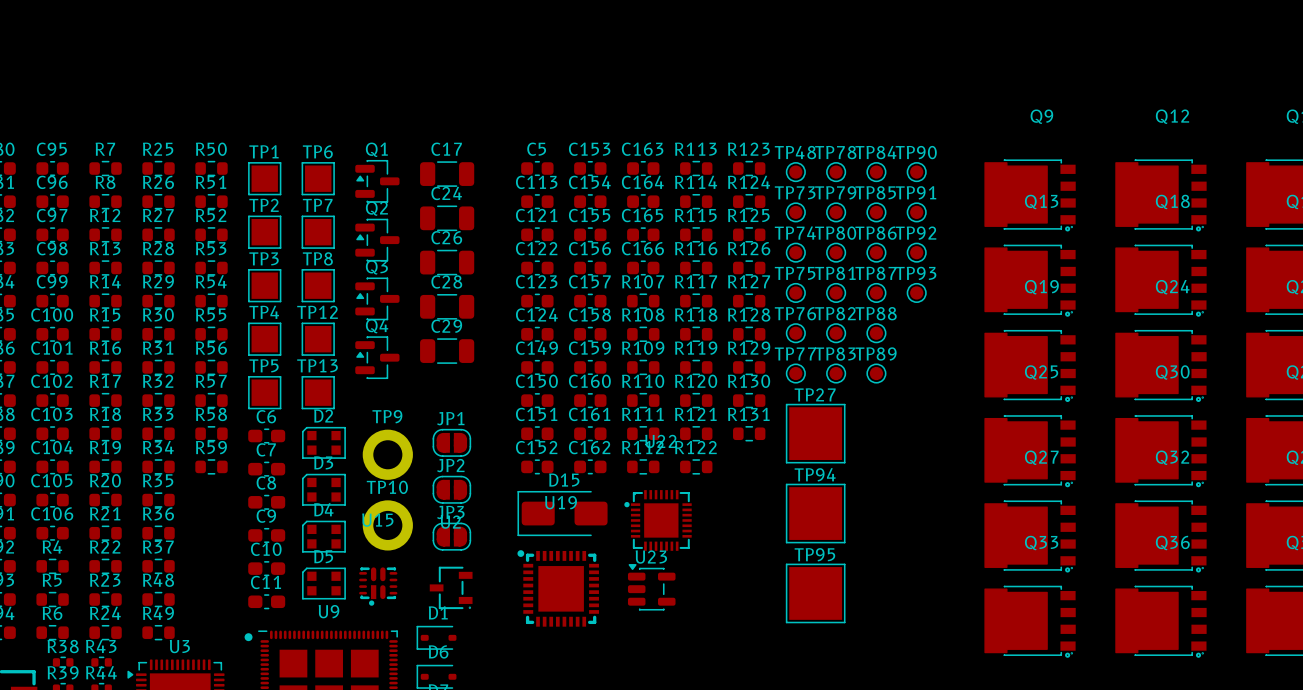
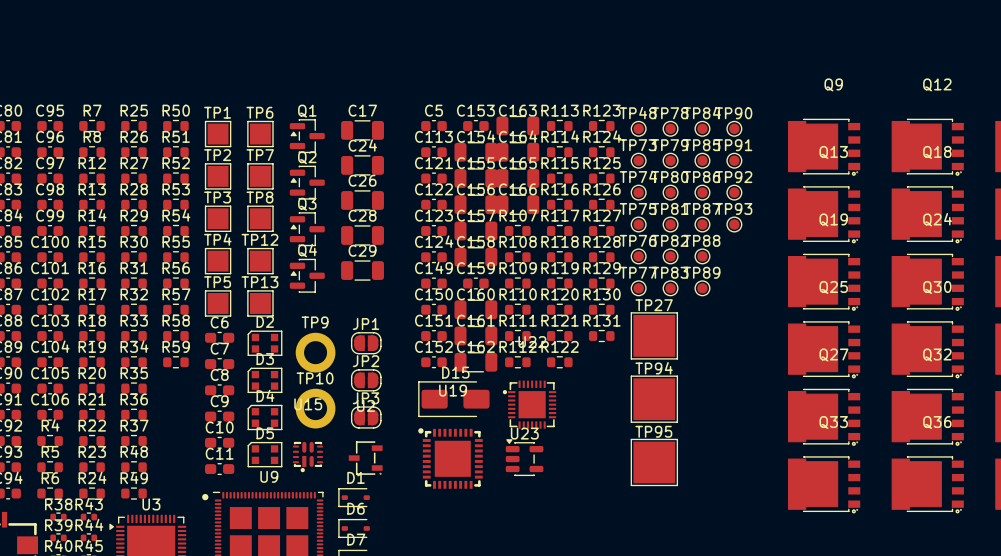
C163 footprint: [627, 161, 660, 177] -> [496, 115, 540, 137]
C154 footprint: [574, 194, 607, 210] -> [454, 142, 498, 163]
C164 footprint: [627, 194, 660, 210] -> [496, 142, 540, 163]
C155 footprint: [574, 227, 607, 243] -> [454, 168, 498, 189]
C165 footprint: [627, 227, 660, 243] -> [496, 168, 540, 189]
C156 footprint: [574, 260, 607, 276] -> [454, 194, 498, 215]
C166 footprint: [627, 260, 660, 276] -> [496, 194, 540, 215]
C157 footprint: [574, 293, 607, 309] -> [454, 220, 498, 242]
C158 footprint: [574, 326, 607, 342] -> [454, 247, 498, 268]
C160 footprint: [574, 393, 607, 409] -> [454, 299, 498, 320]
C161 footprint: [574, 426, 607, 442] -> [454, 325, 498, 347]
C162 footprint: [574, 459, 607, 475] -> [454, 352, 498, 373]

